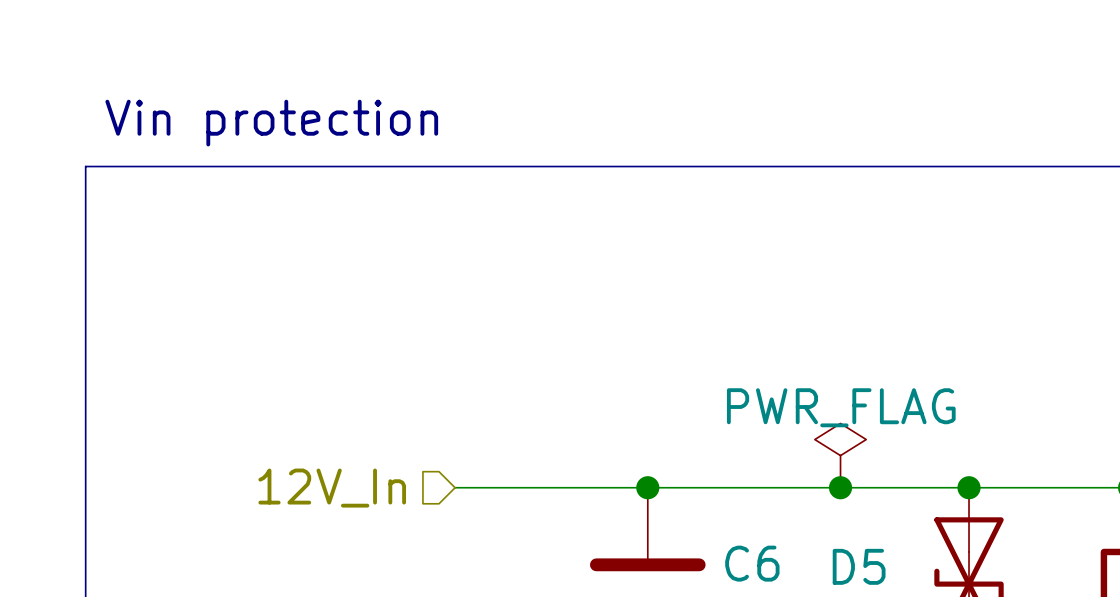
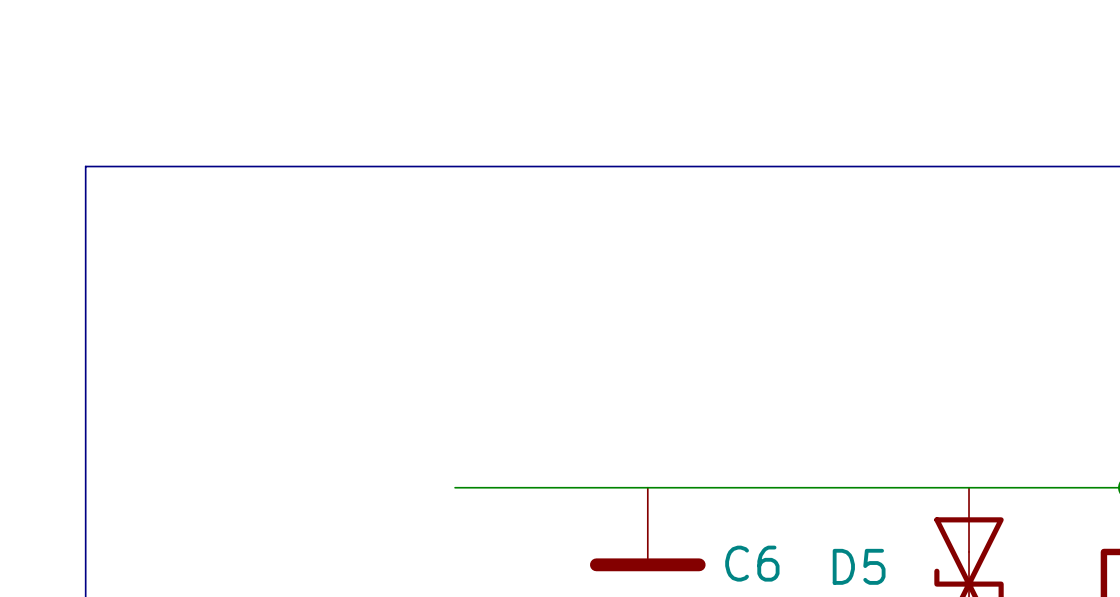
text: Vin protection (271, 123) -> none
power symbol: PWR_FLAG (840, 455) -> none
junction: (647, 487) -> none
junction: (840, 487) -> none
junction: (969, 487) -> none
hierarchical label: 12V_In (332, 488) -> none

